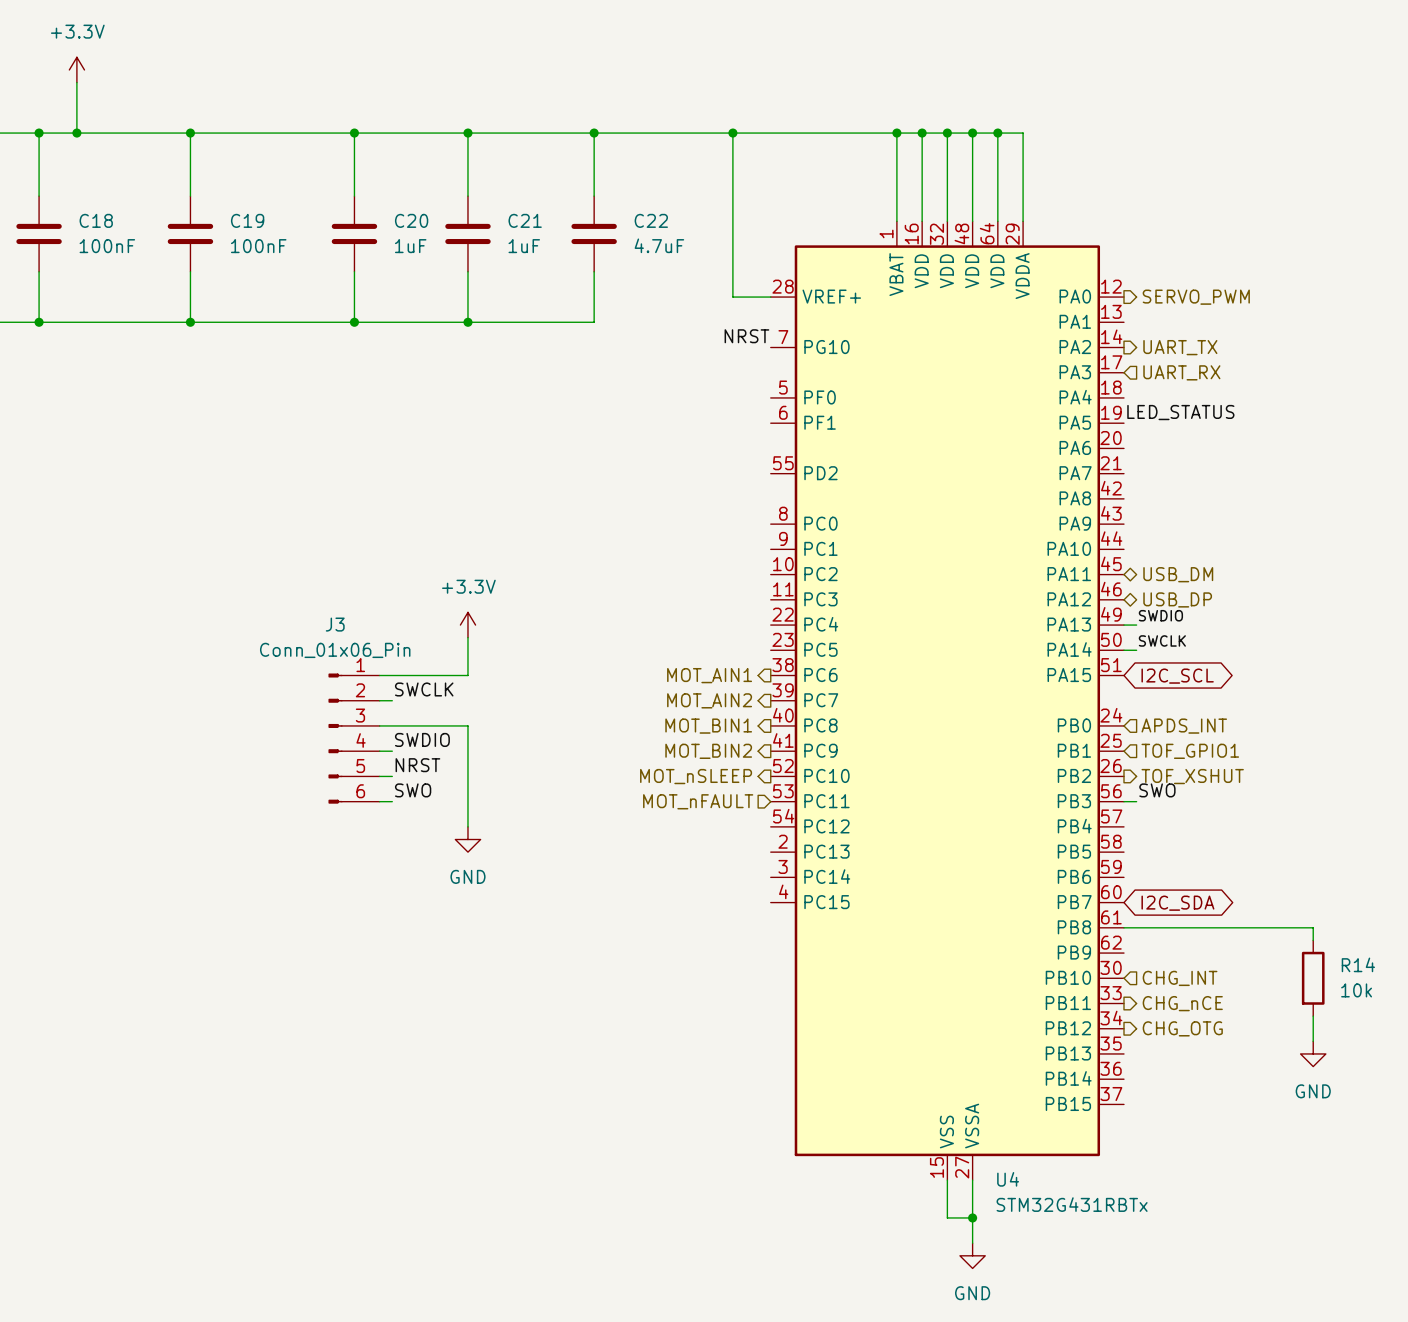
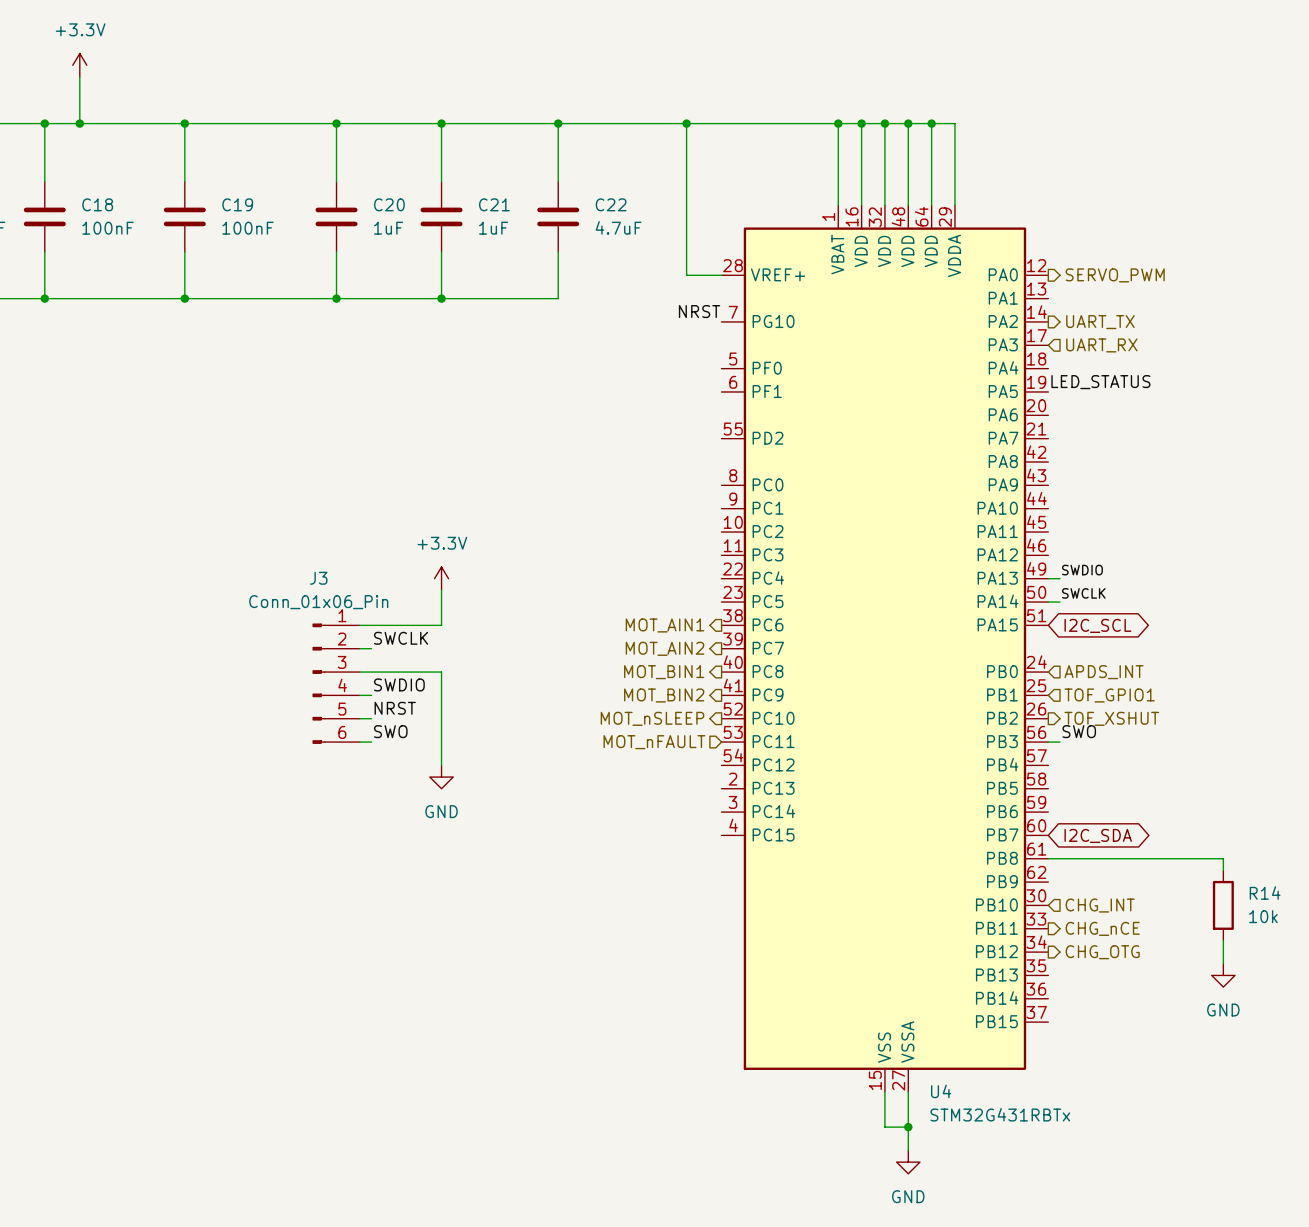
hierarchical label: USB_DM (1178, 574) -> none
hierarchical label: USB_DP (1177, 599) -> none

